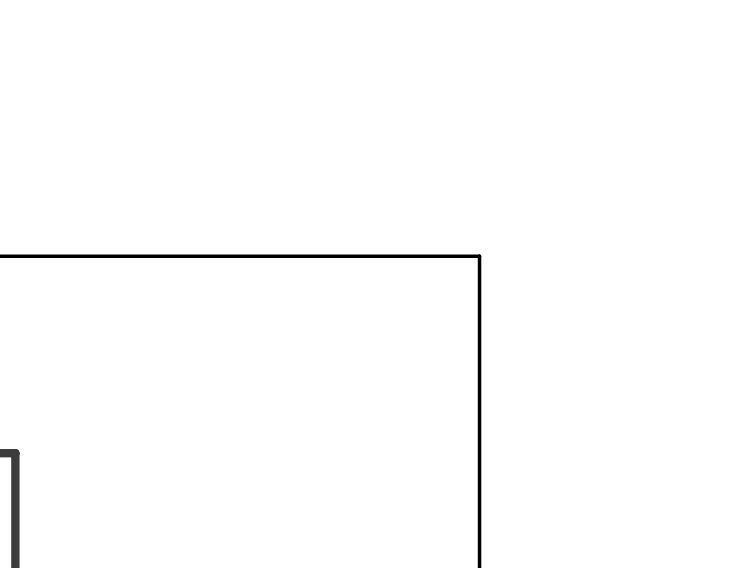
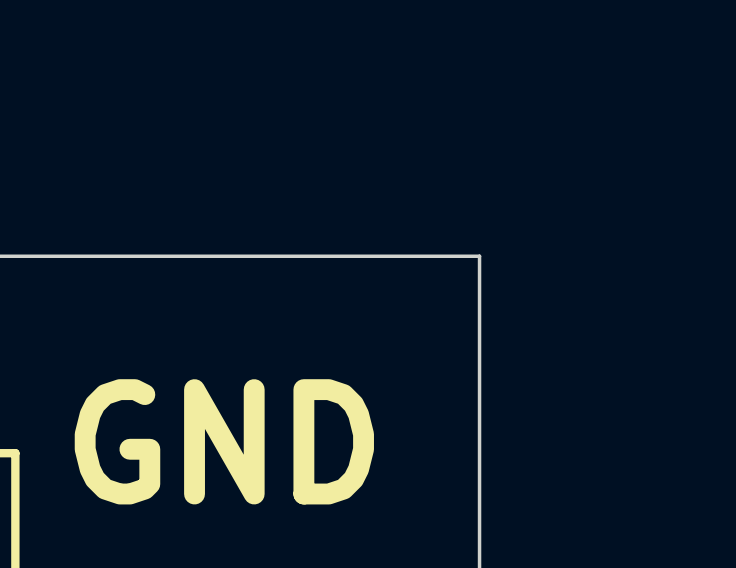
text: none -> GND (224, 441)

